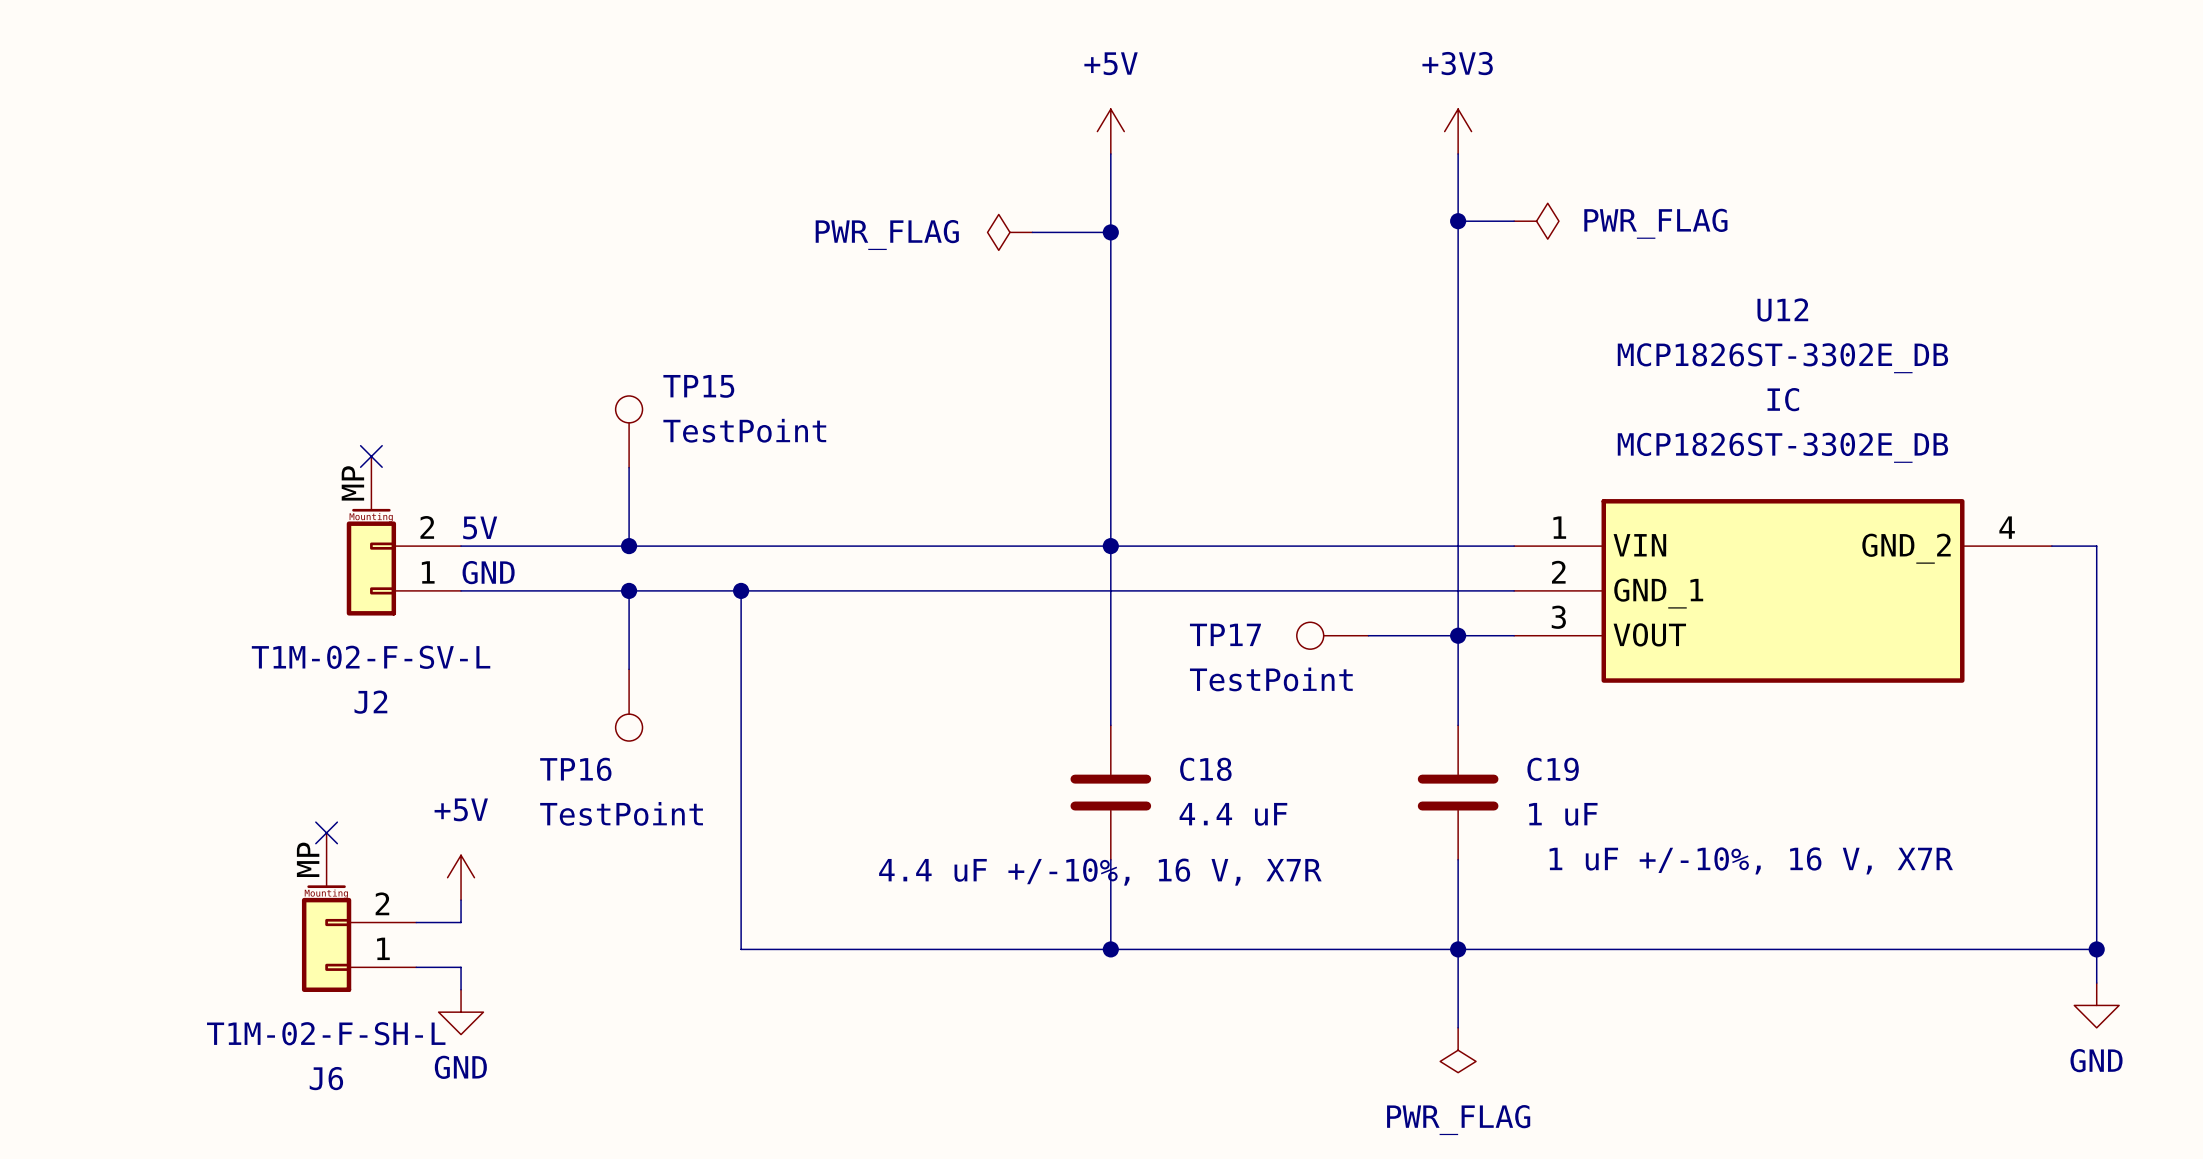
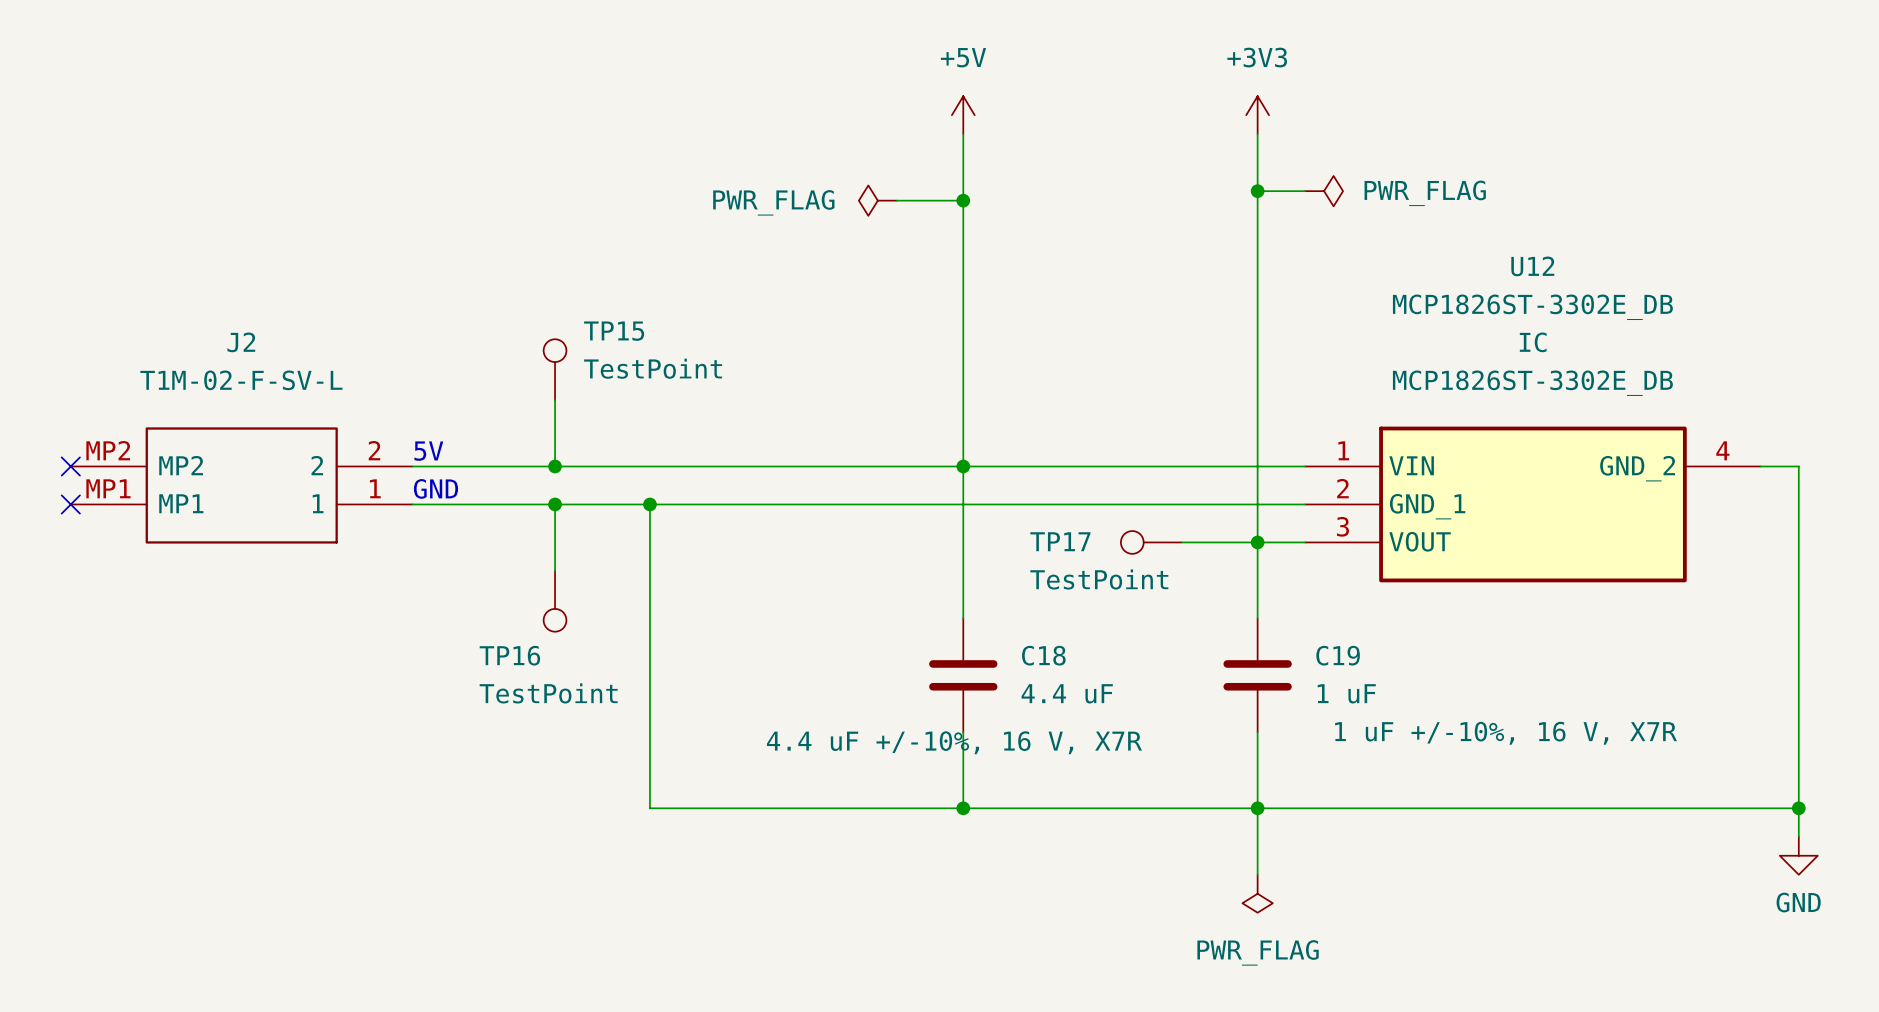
J2 symbol: [346, 456, 462, 616] -> [70, 427, 413, 544]
no-connect mark: (371, 456) -> none
no-connect mark: none -> (70, 466)
no-connect mark: none -> (70, 504)
J2 value position: T1M-02-F-SV-L (371, 657) -> T1M-02-F-SV-L (241, 380)
J2 name position: J2 (370, 702) -> J2 (241, 342)
no-connect mark: (326, 832) -> none
power symbol: +5V (461, 877) -> none
wire: (461, 900) (461, 922) (416, 922) -> none
J6: T1M-02-F-SH-L (359, 912) -> none
wire: (416, 967) (461, 967) (461, 989) -> none
power symbol: GND (461, 1012) -> none

